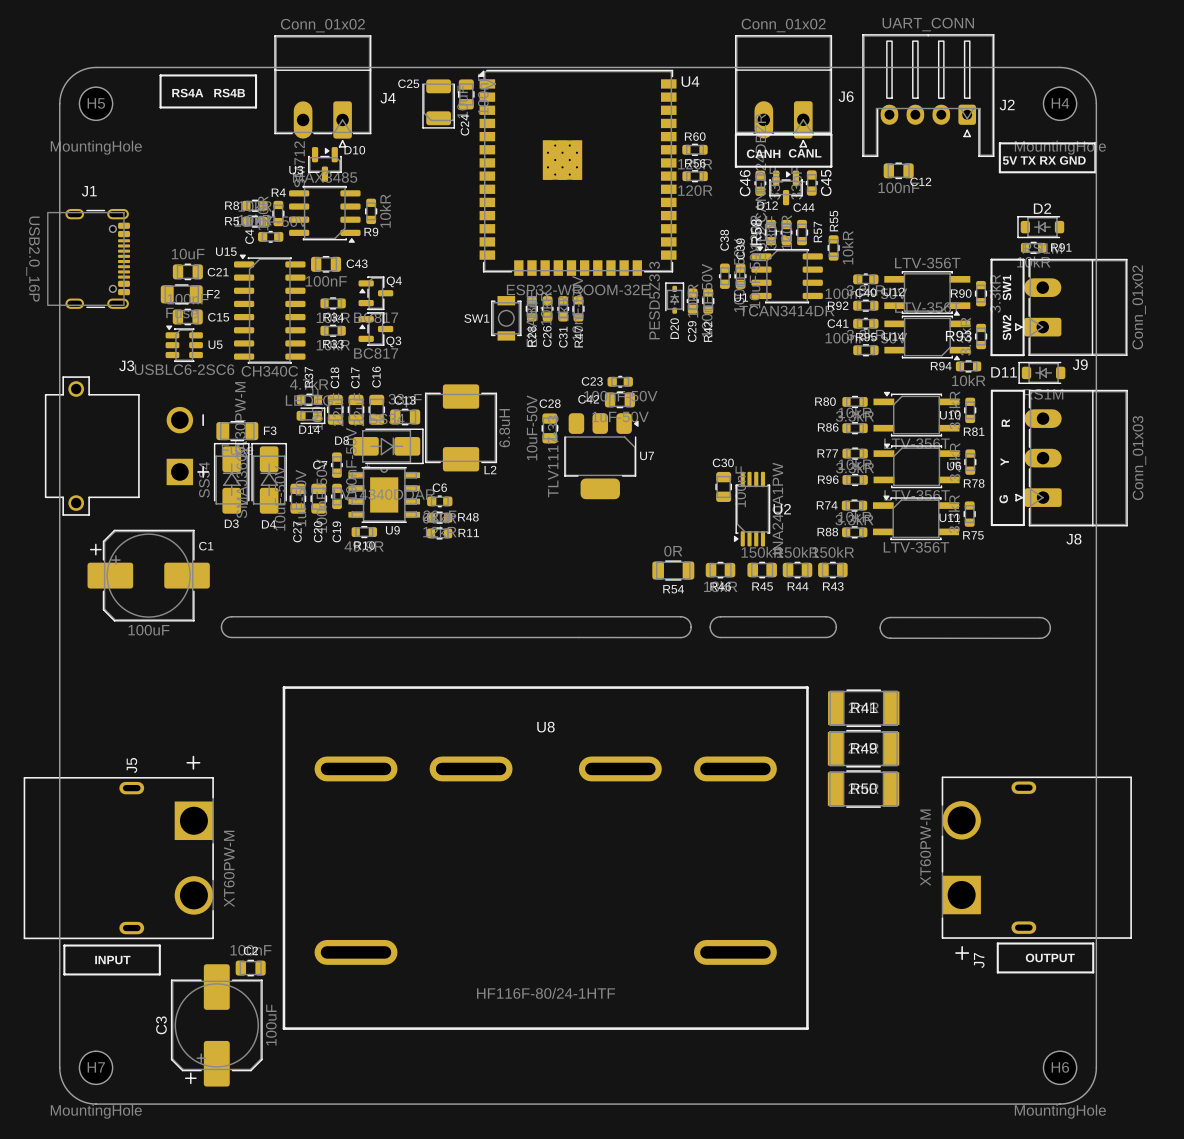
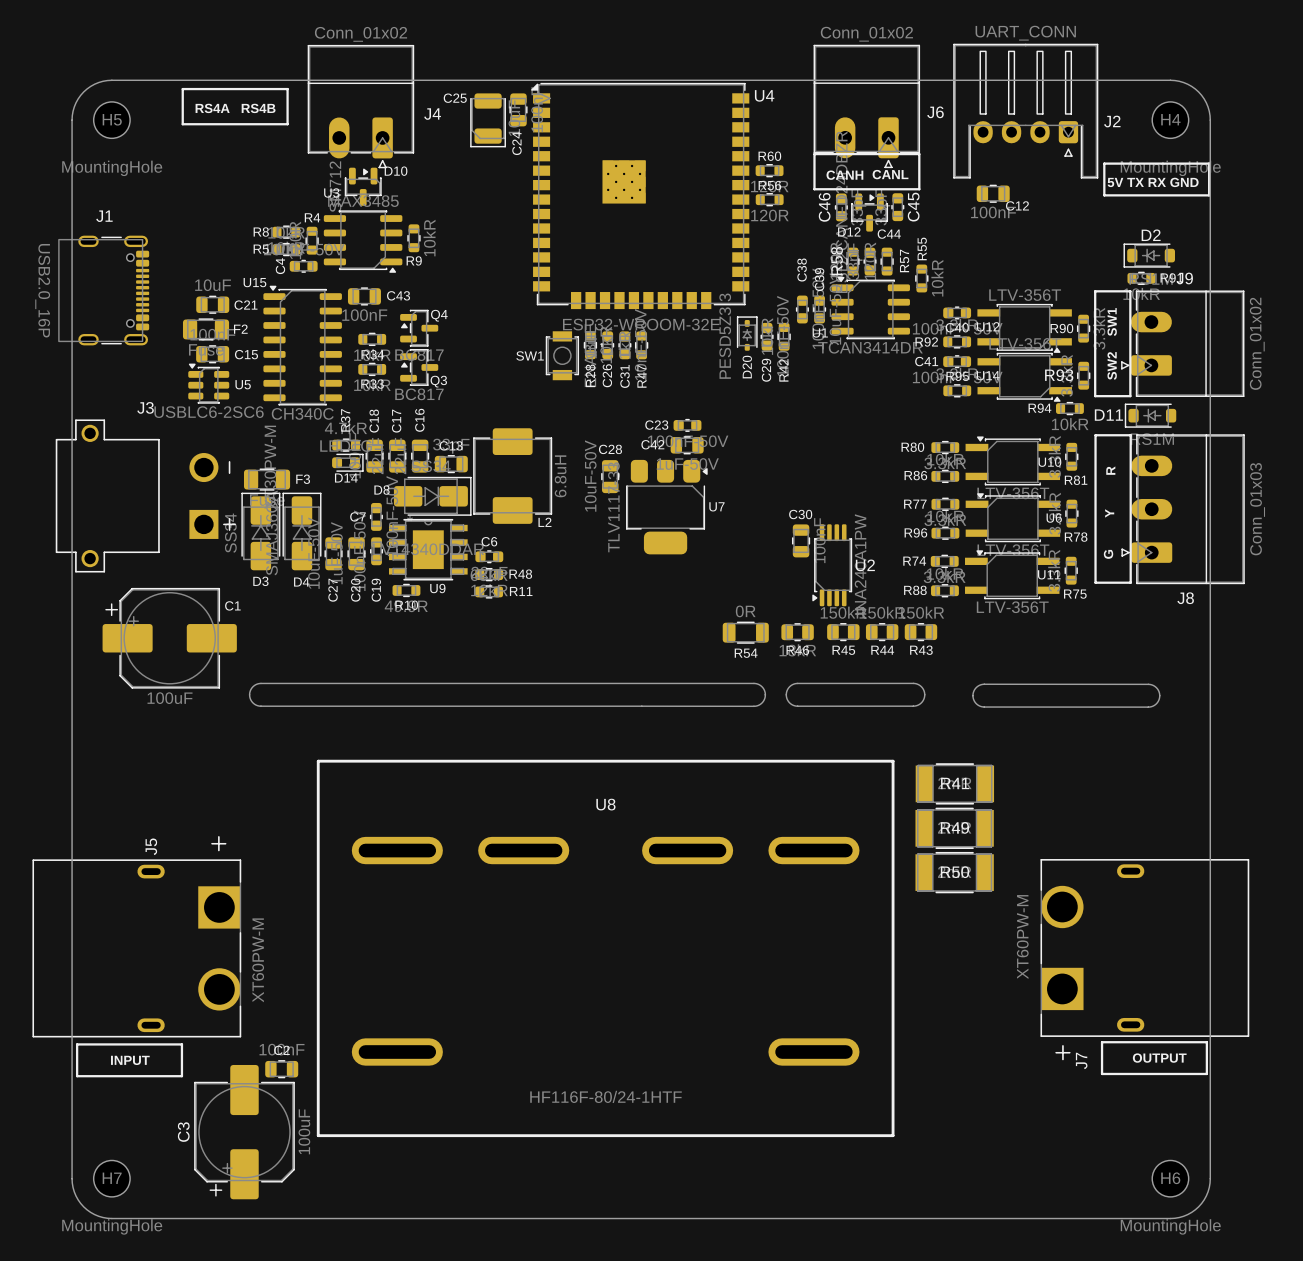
J9 name position: J9 (1080, 364) -> J9 (1184, 278)

